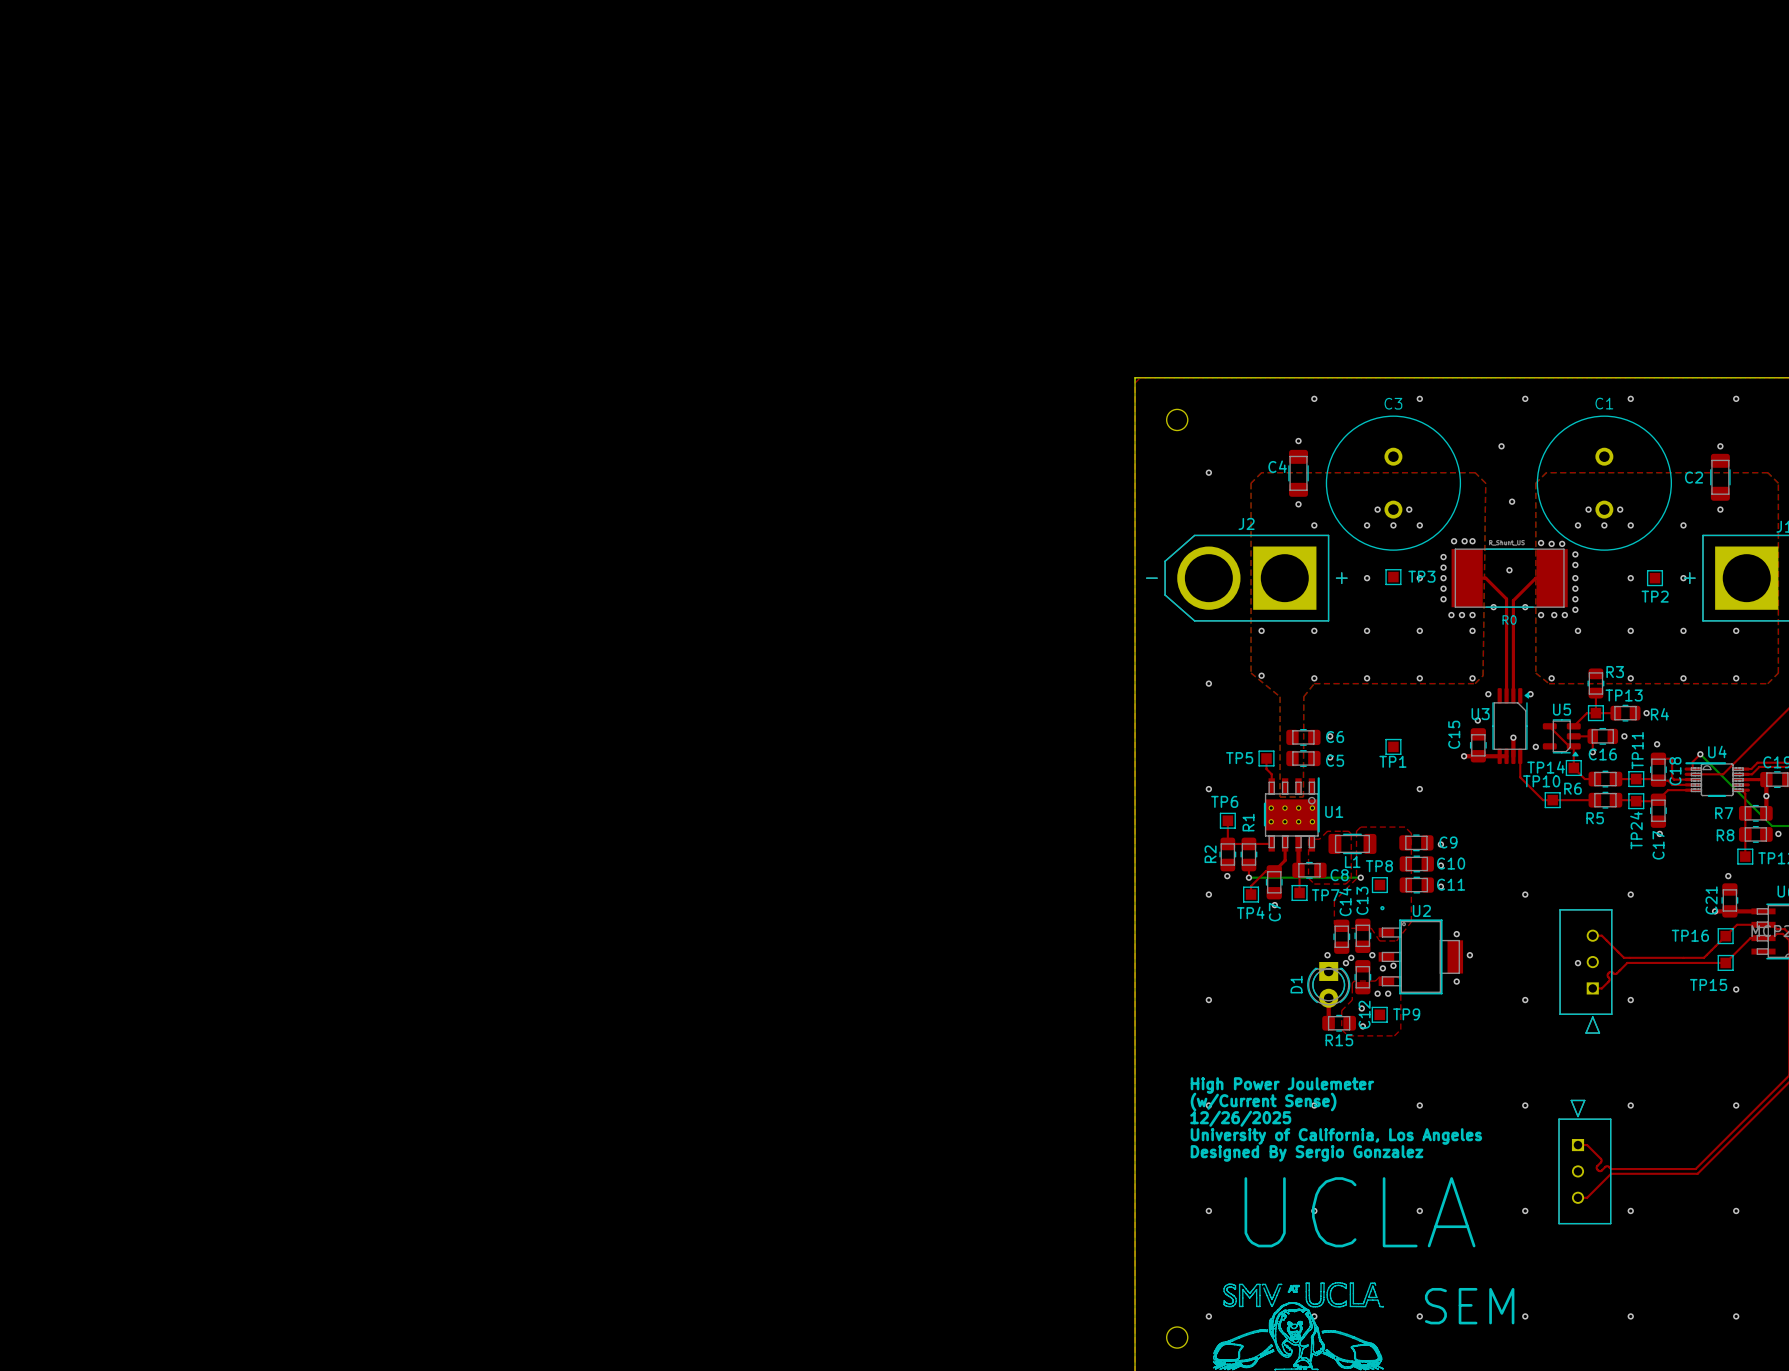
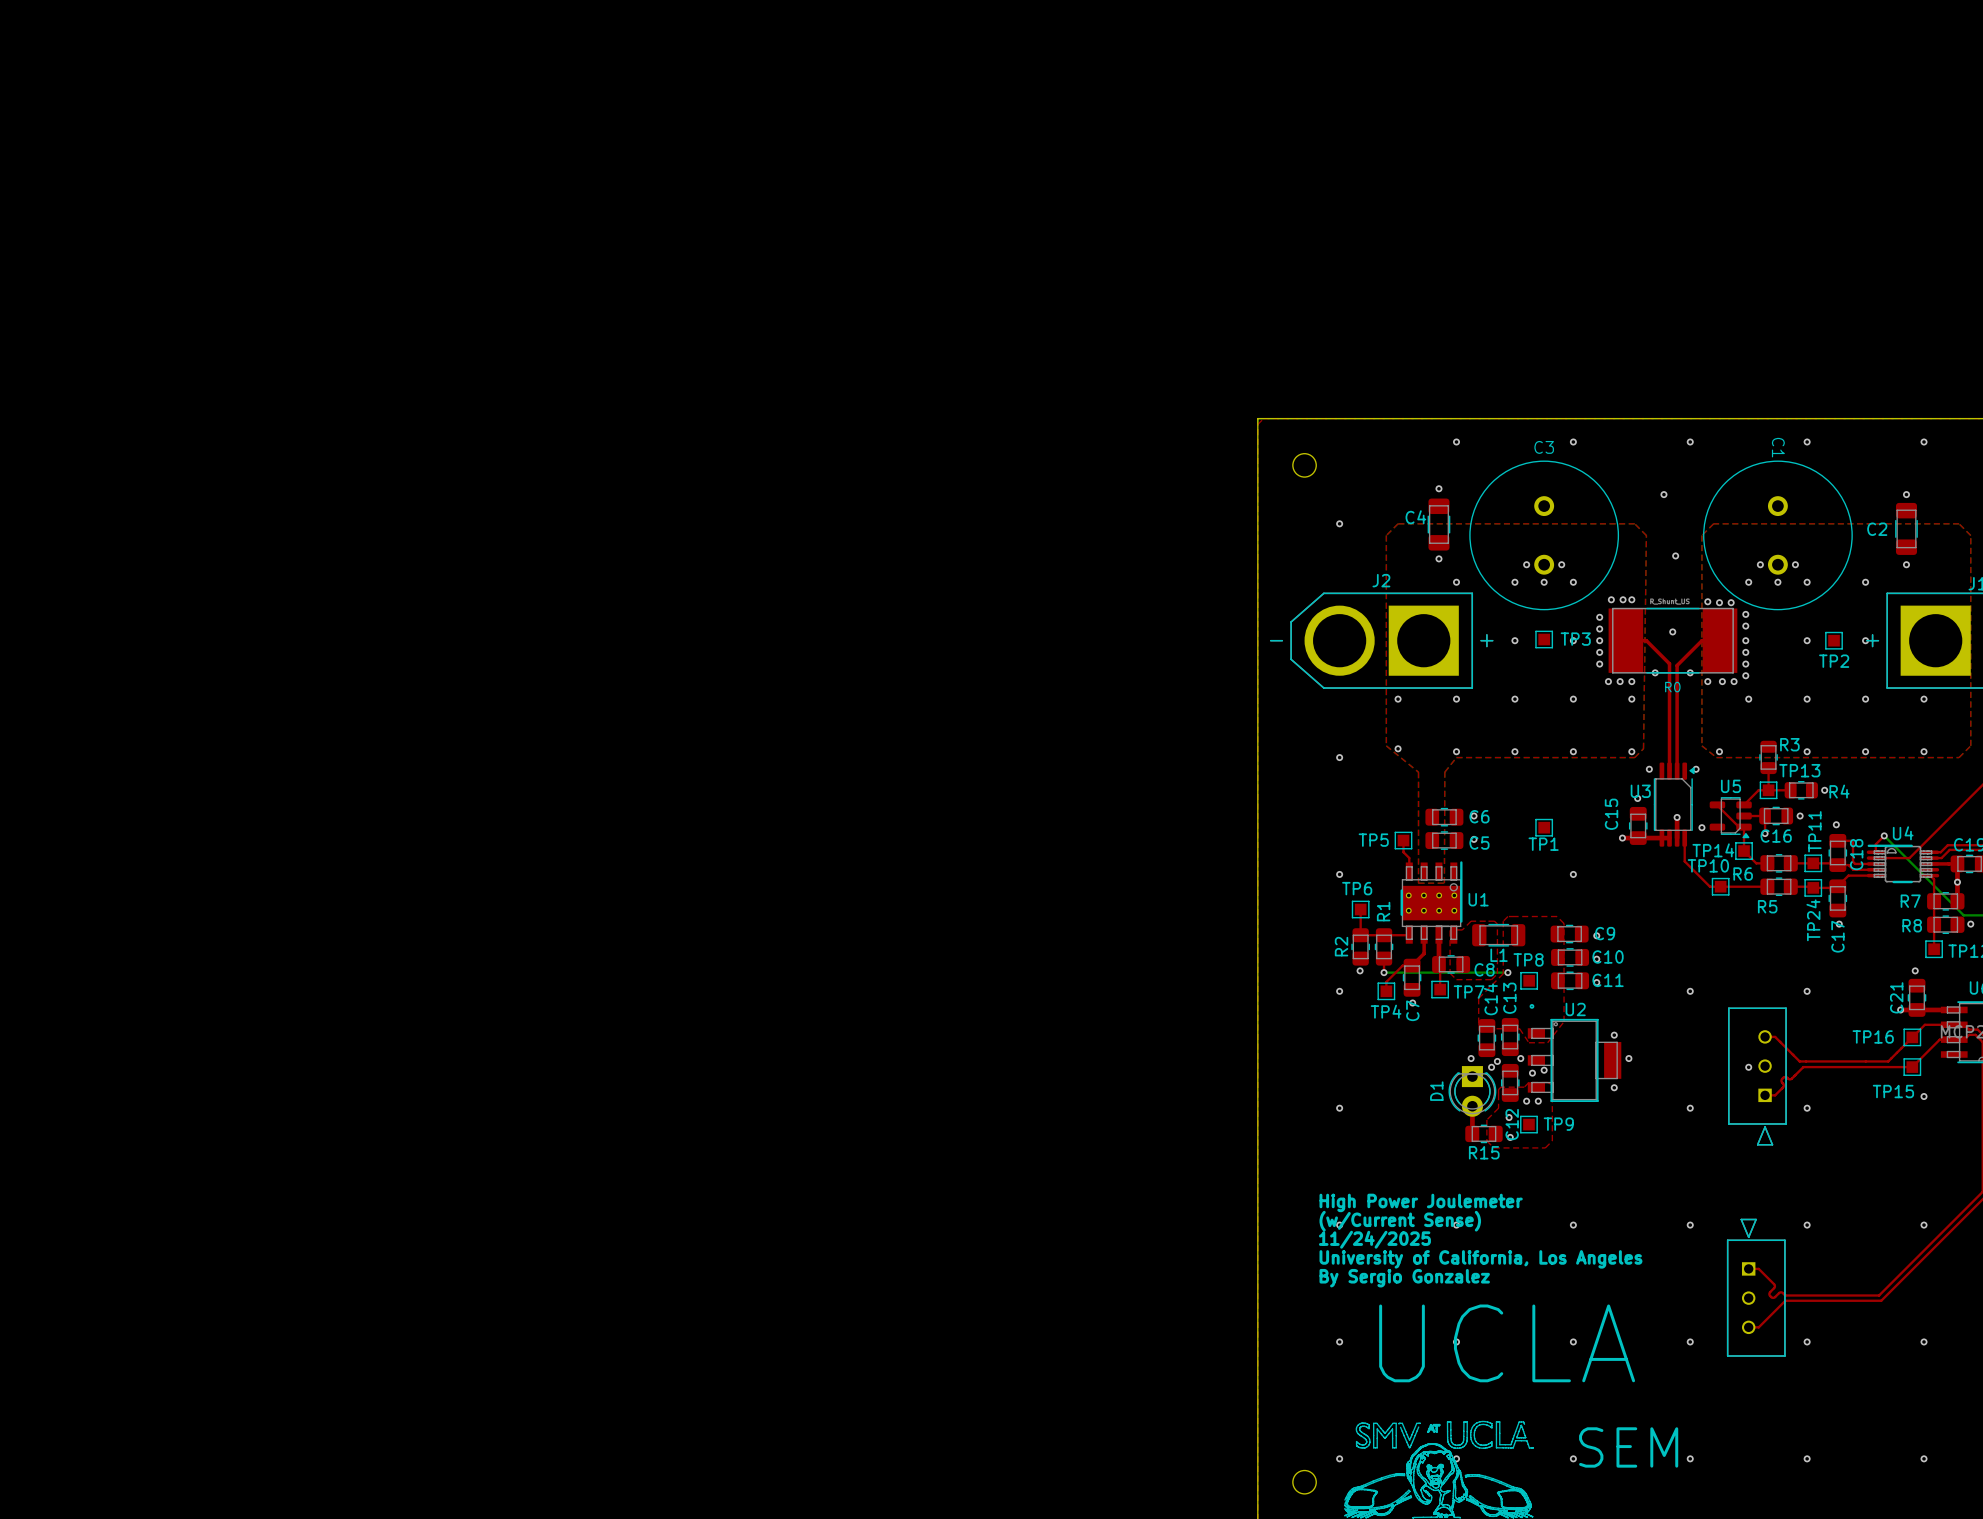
C1 name rotation: 0° (1604, 403) -> 90° clockwise (1778, 447)
text: 12/26/2025 (1240, 1118) -> 11/24/2025 (1374, 1239)
text: Designed By Sergio Gonzalez (1307, 1153) -> By Sergio Gonzalez (1404, 1278)

